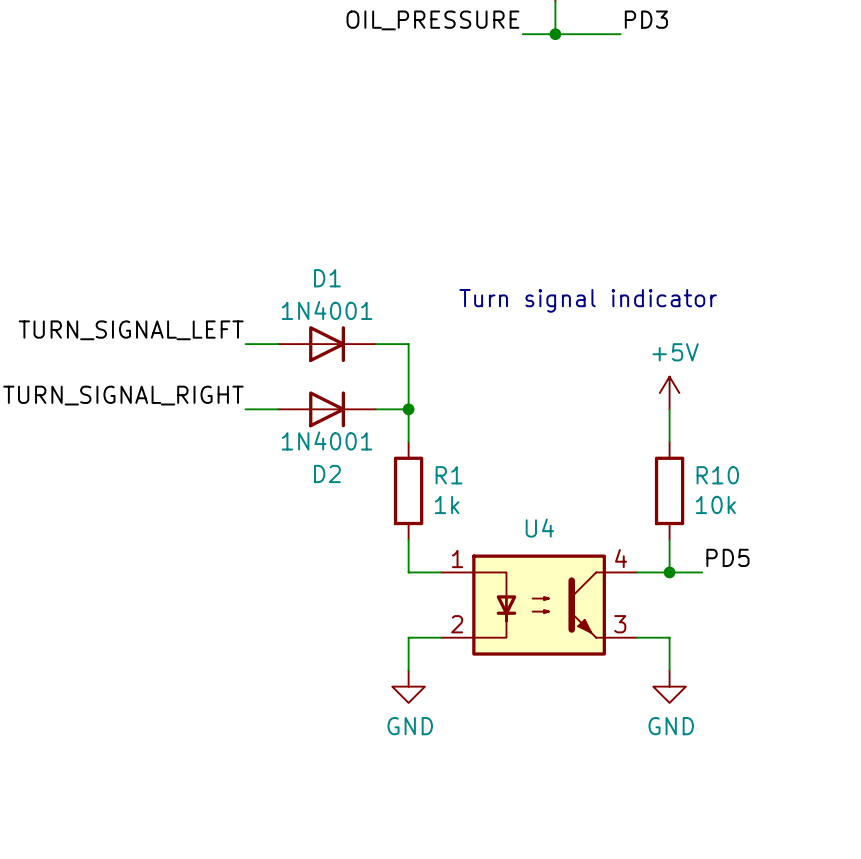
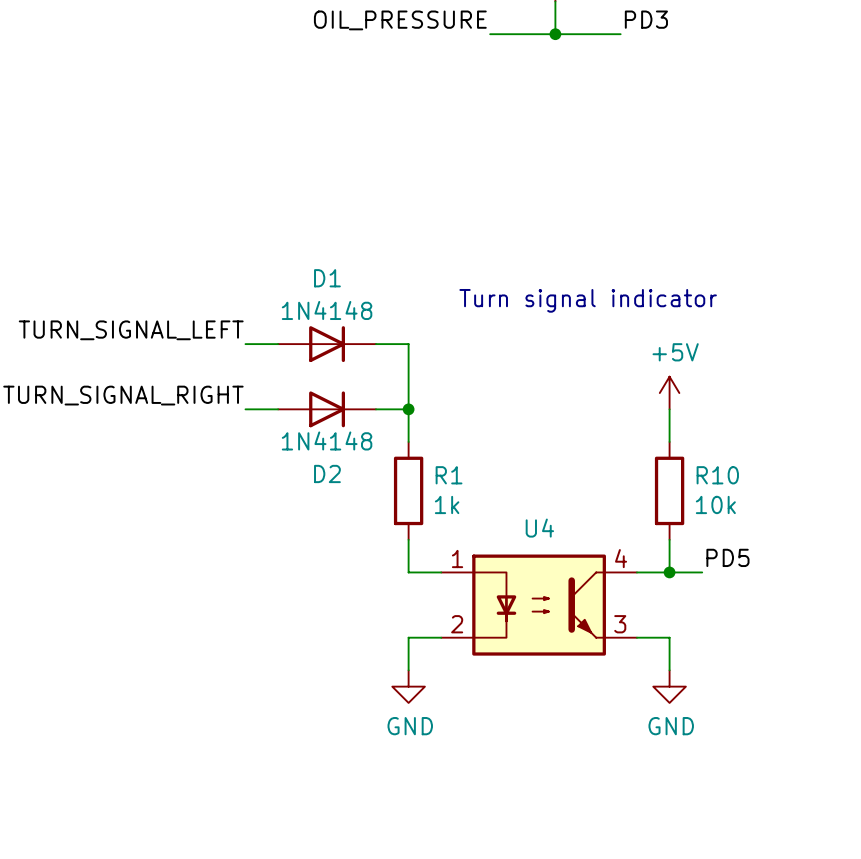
label position: OIL_PRESSURE (432, 20) -> OIL_PRESSURE (400, 20)
wire: none -> (490, 34) (522, 34)
D1 value: 1N4001 (327, 310) -> 1N4148 (327, 310)
D2 value: 1N4001 (327, 440) -> 1N4148 (327, 440)

